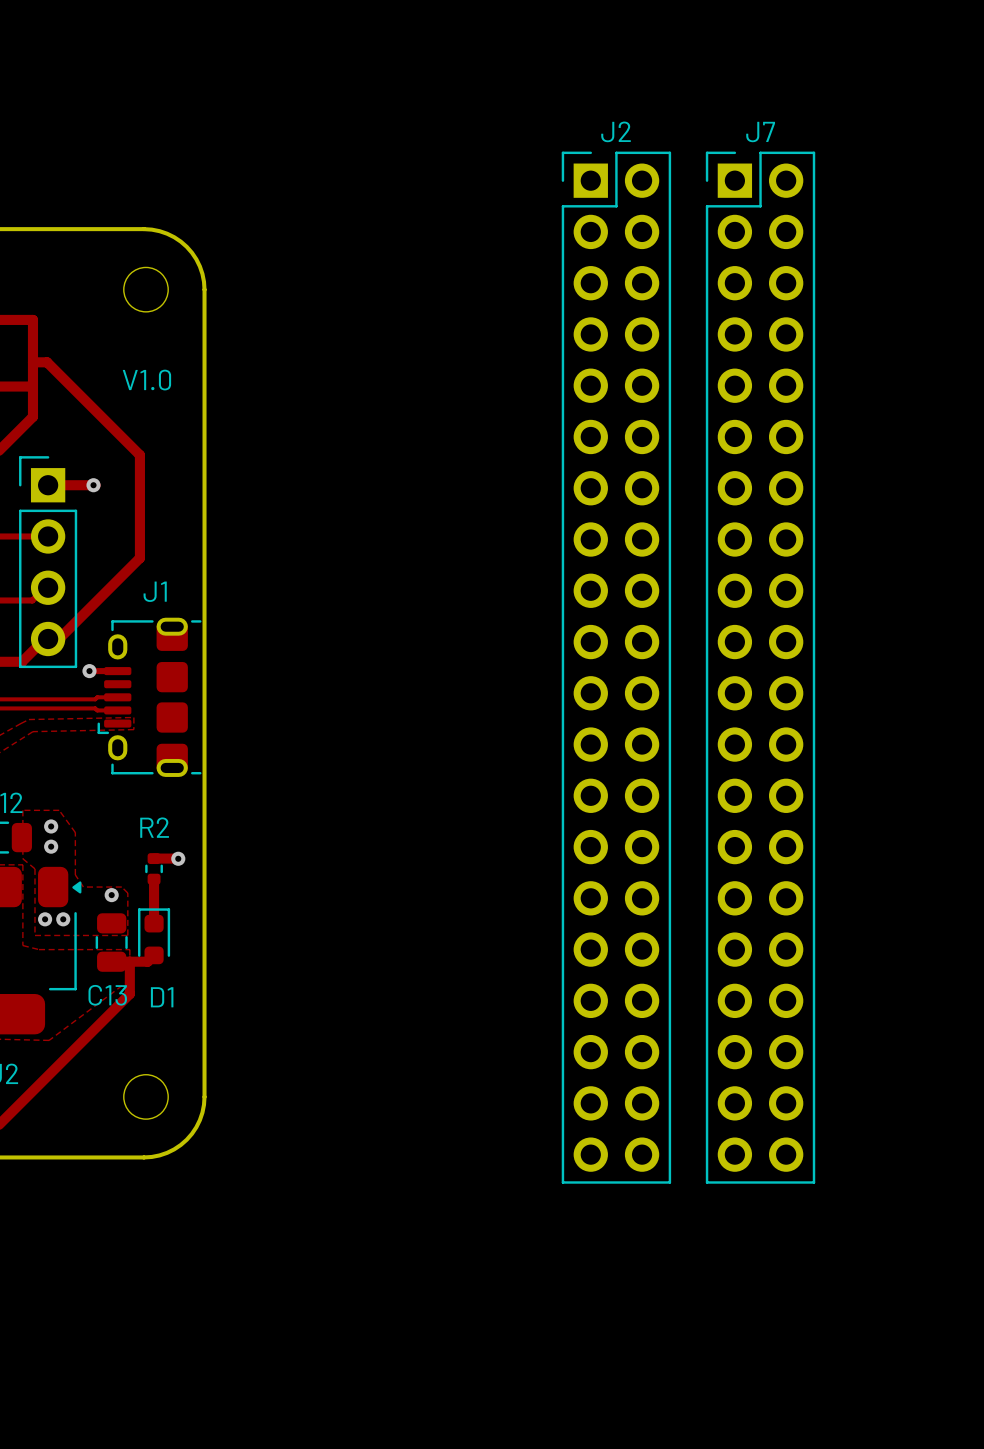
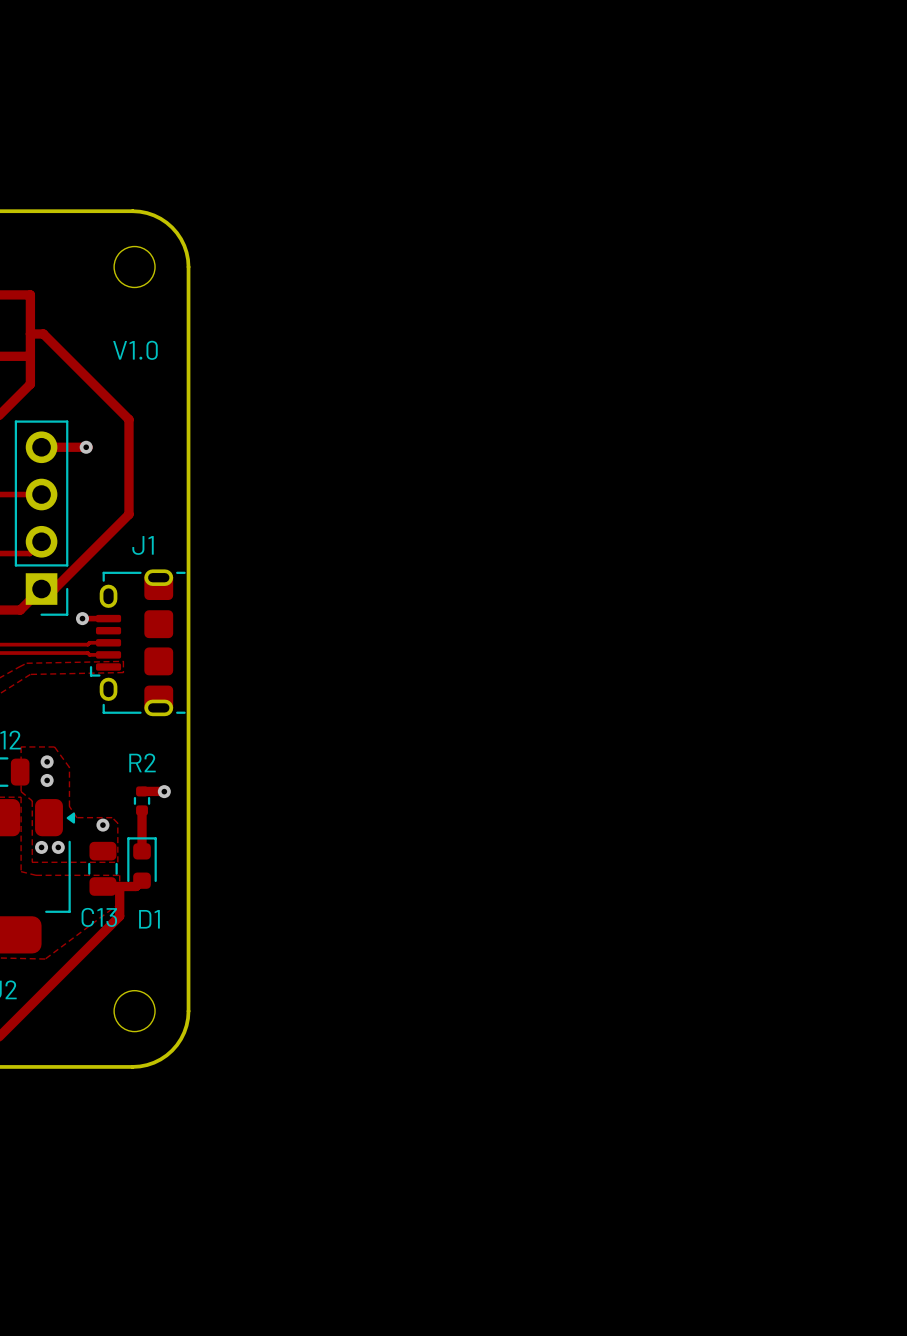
part rotation: 0° (48, 562) -> 180° (41, 518)
J2: (616, 667) -> none
J7: (760, 667) -> none

